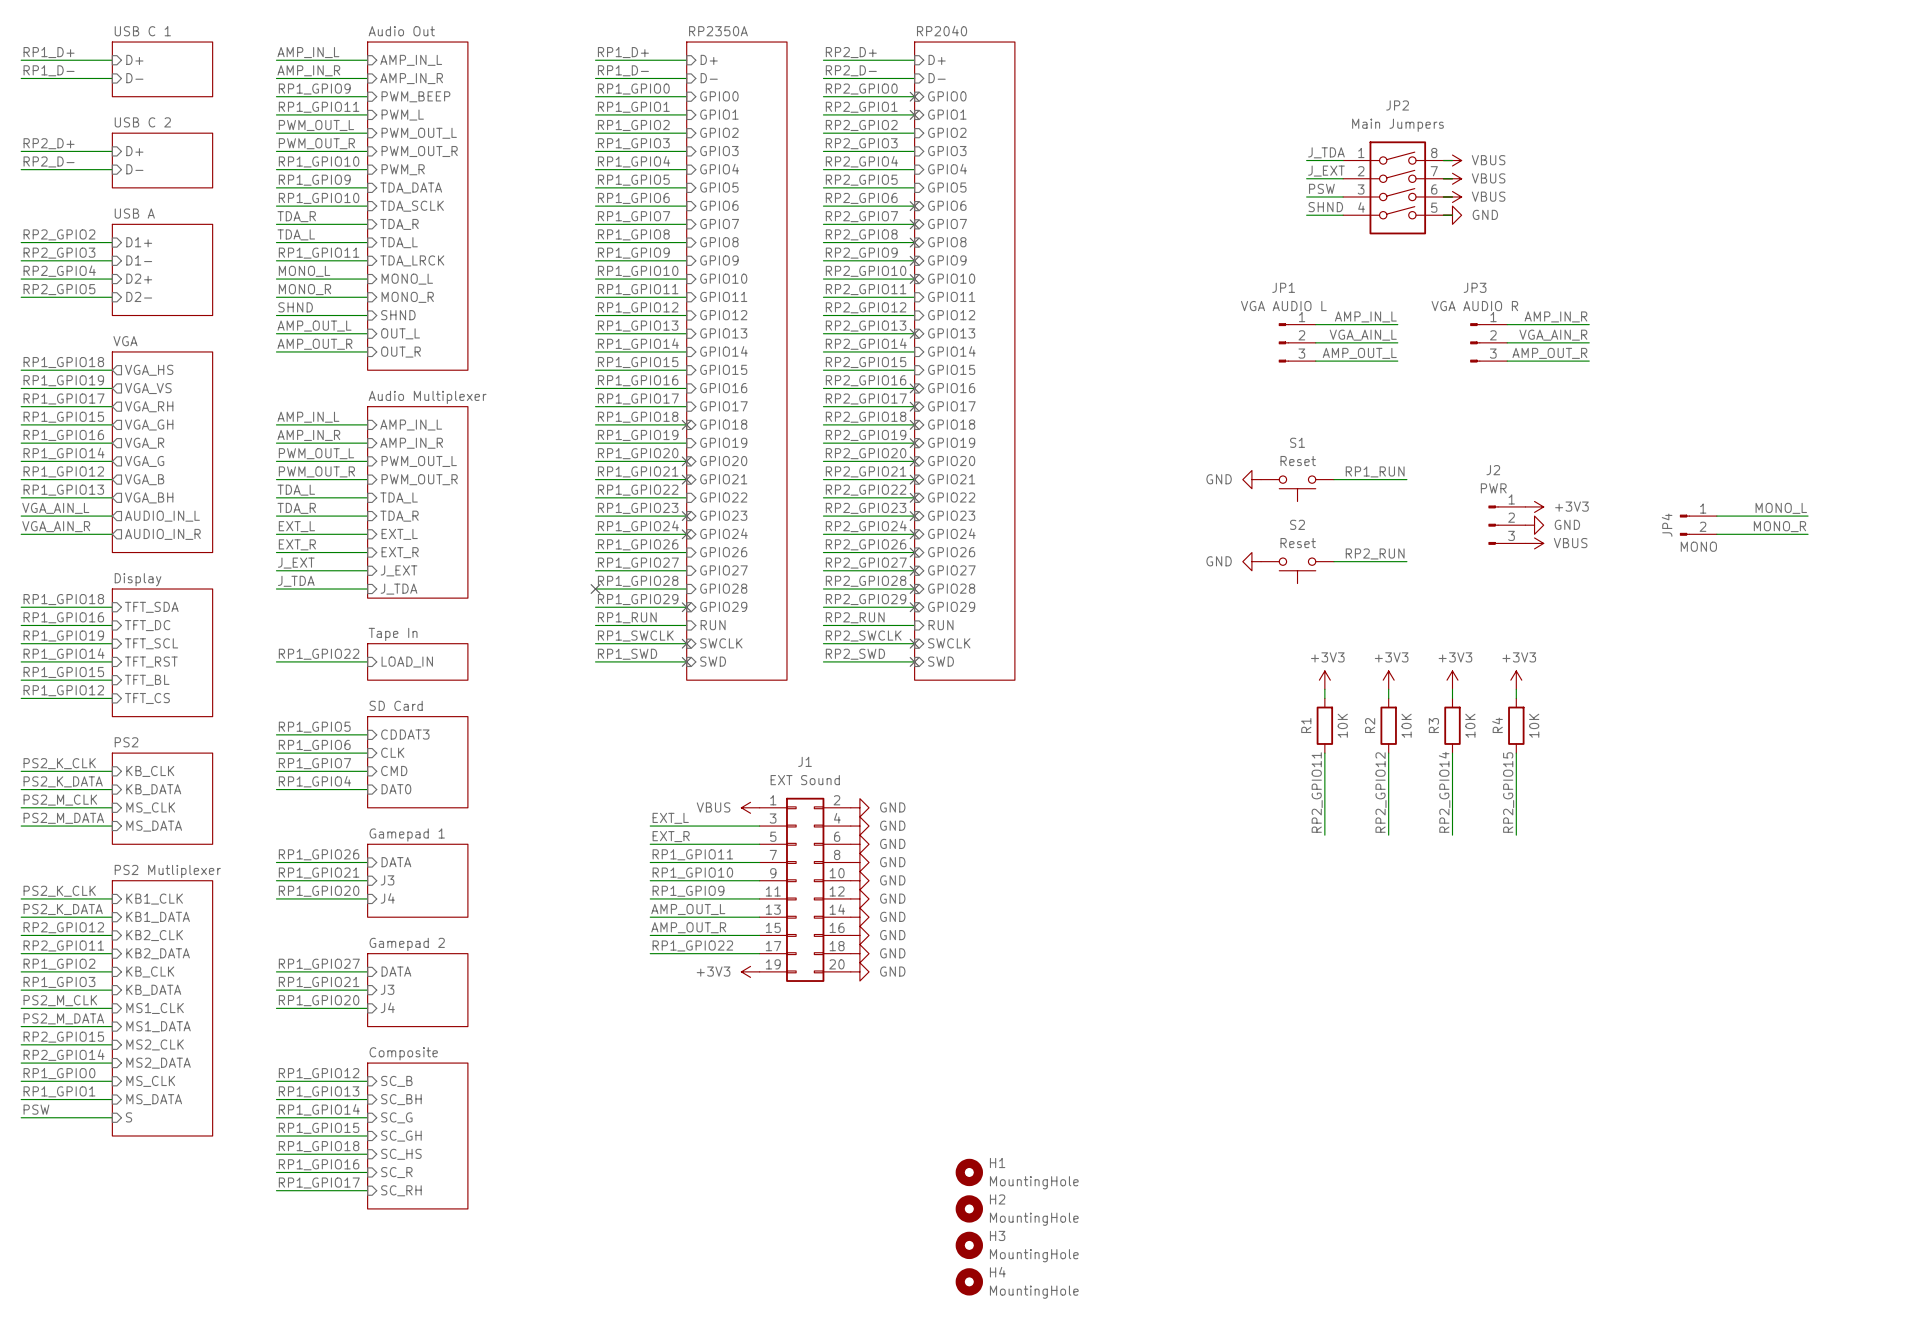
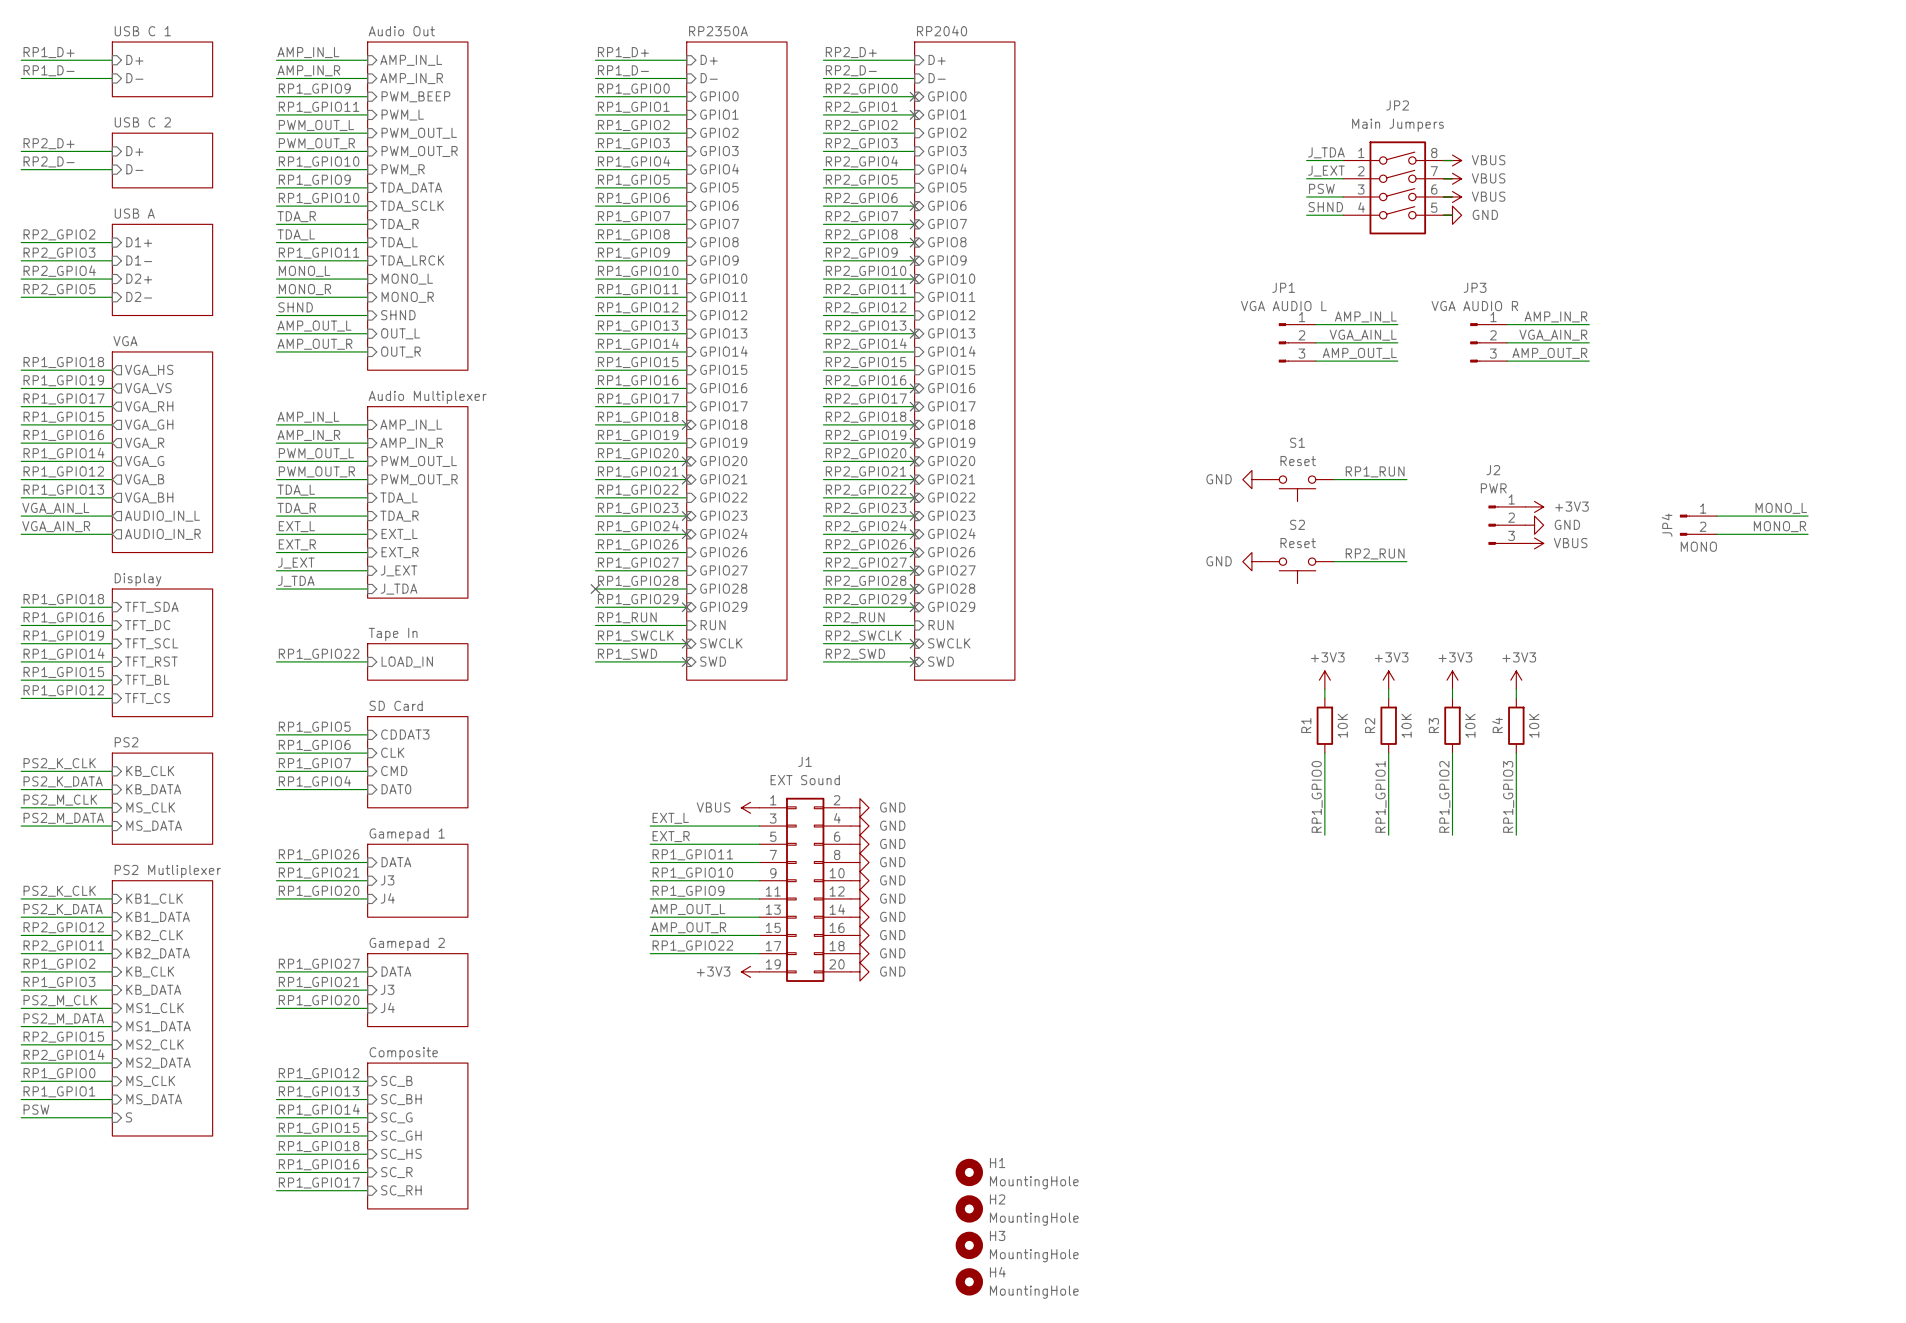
label: RP2_GPIO11 (1317, 792) -> RP1_GPIO0 (1317, 796)
label: RP2_GPIO12 (1380, 792) -> RP1_GPIO1 (1380, 796)
label: RP2_GPIO14 (1444, 792) -> RP1_GPIO2 (1444, 796)
label: RP2_GPIO15 (1508, 792) -> RP1_GPIO3 (1508, 796)

